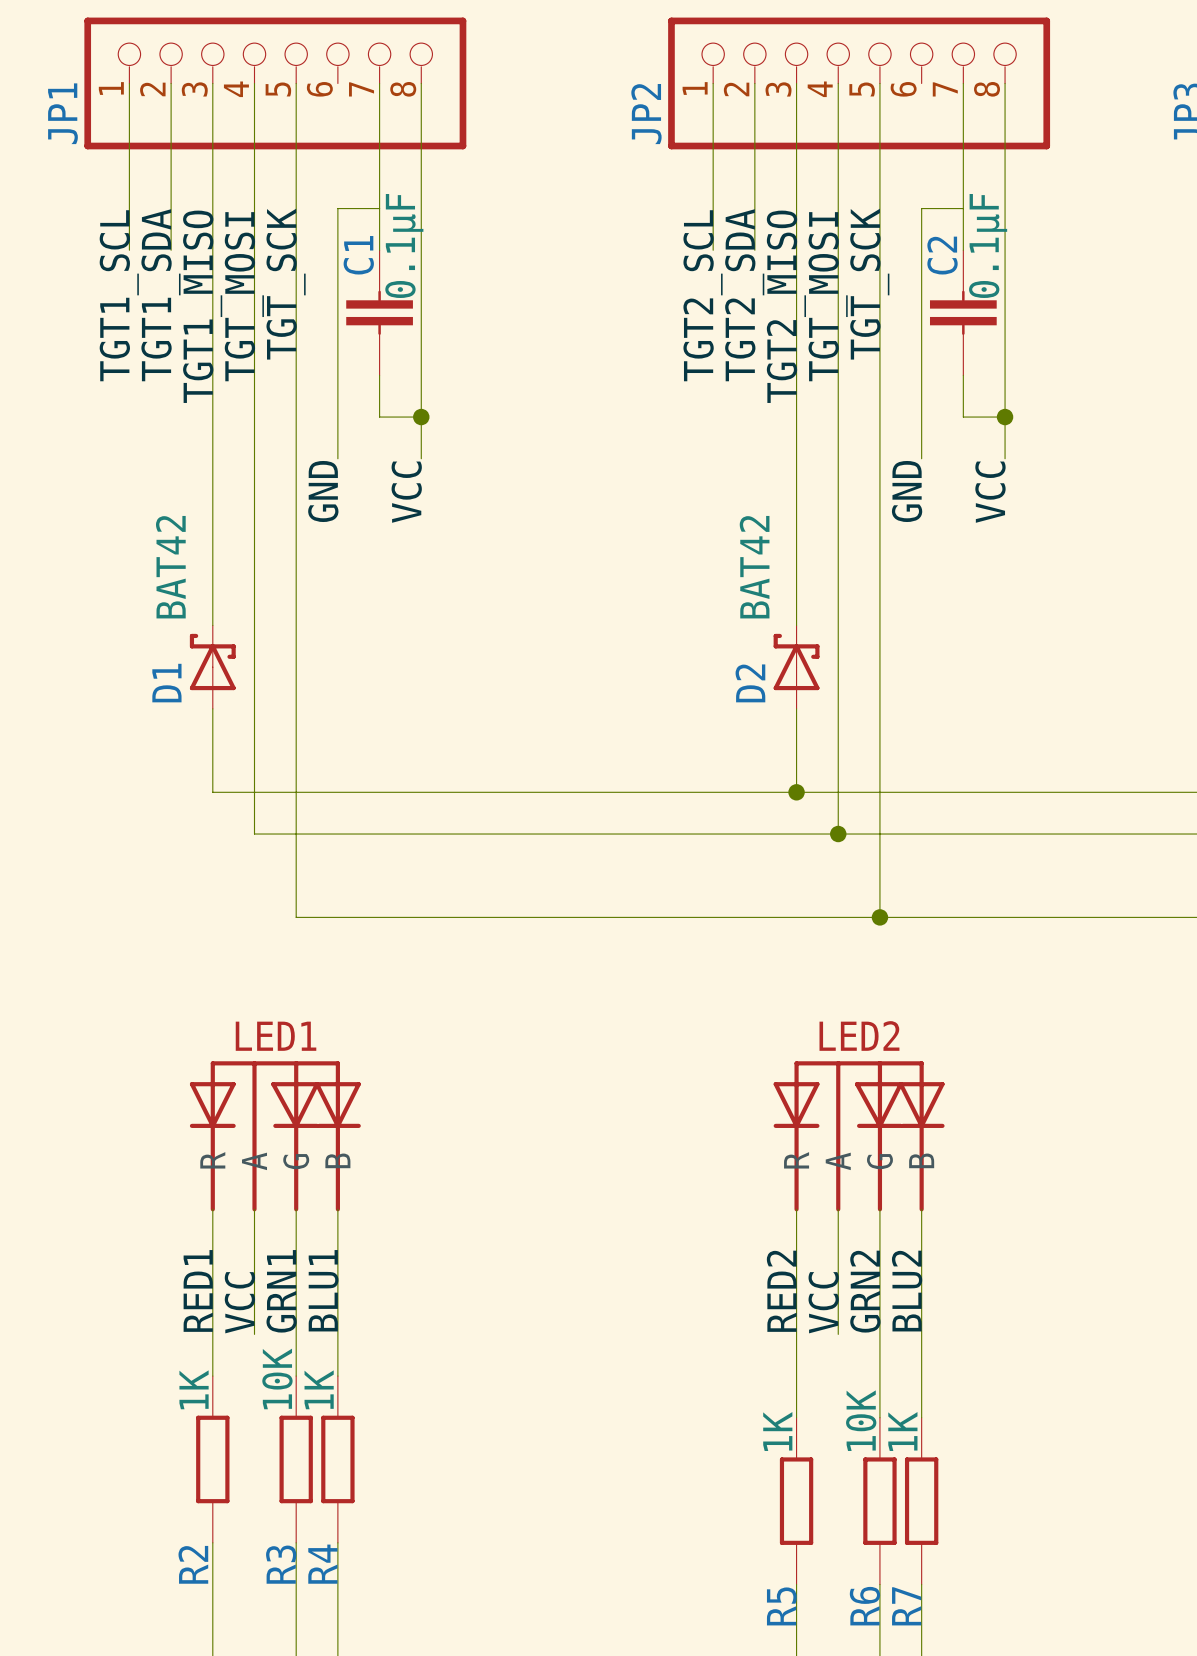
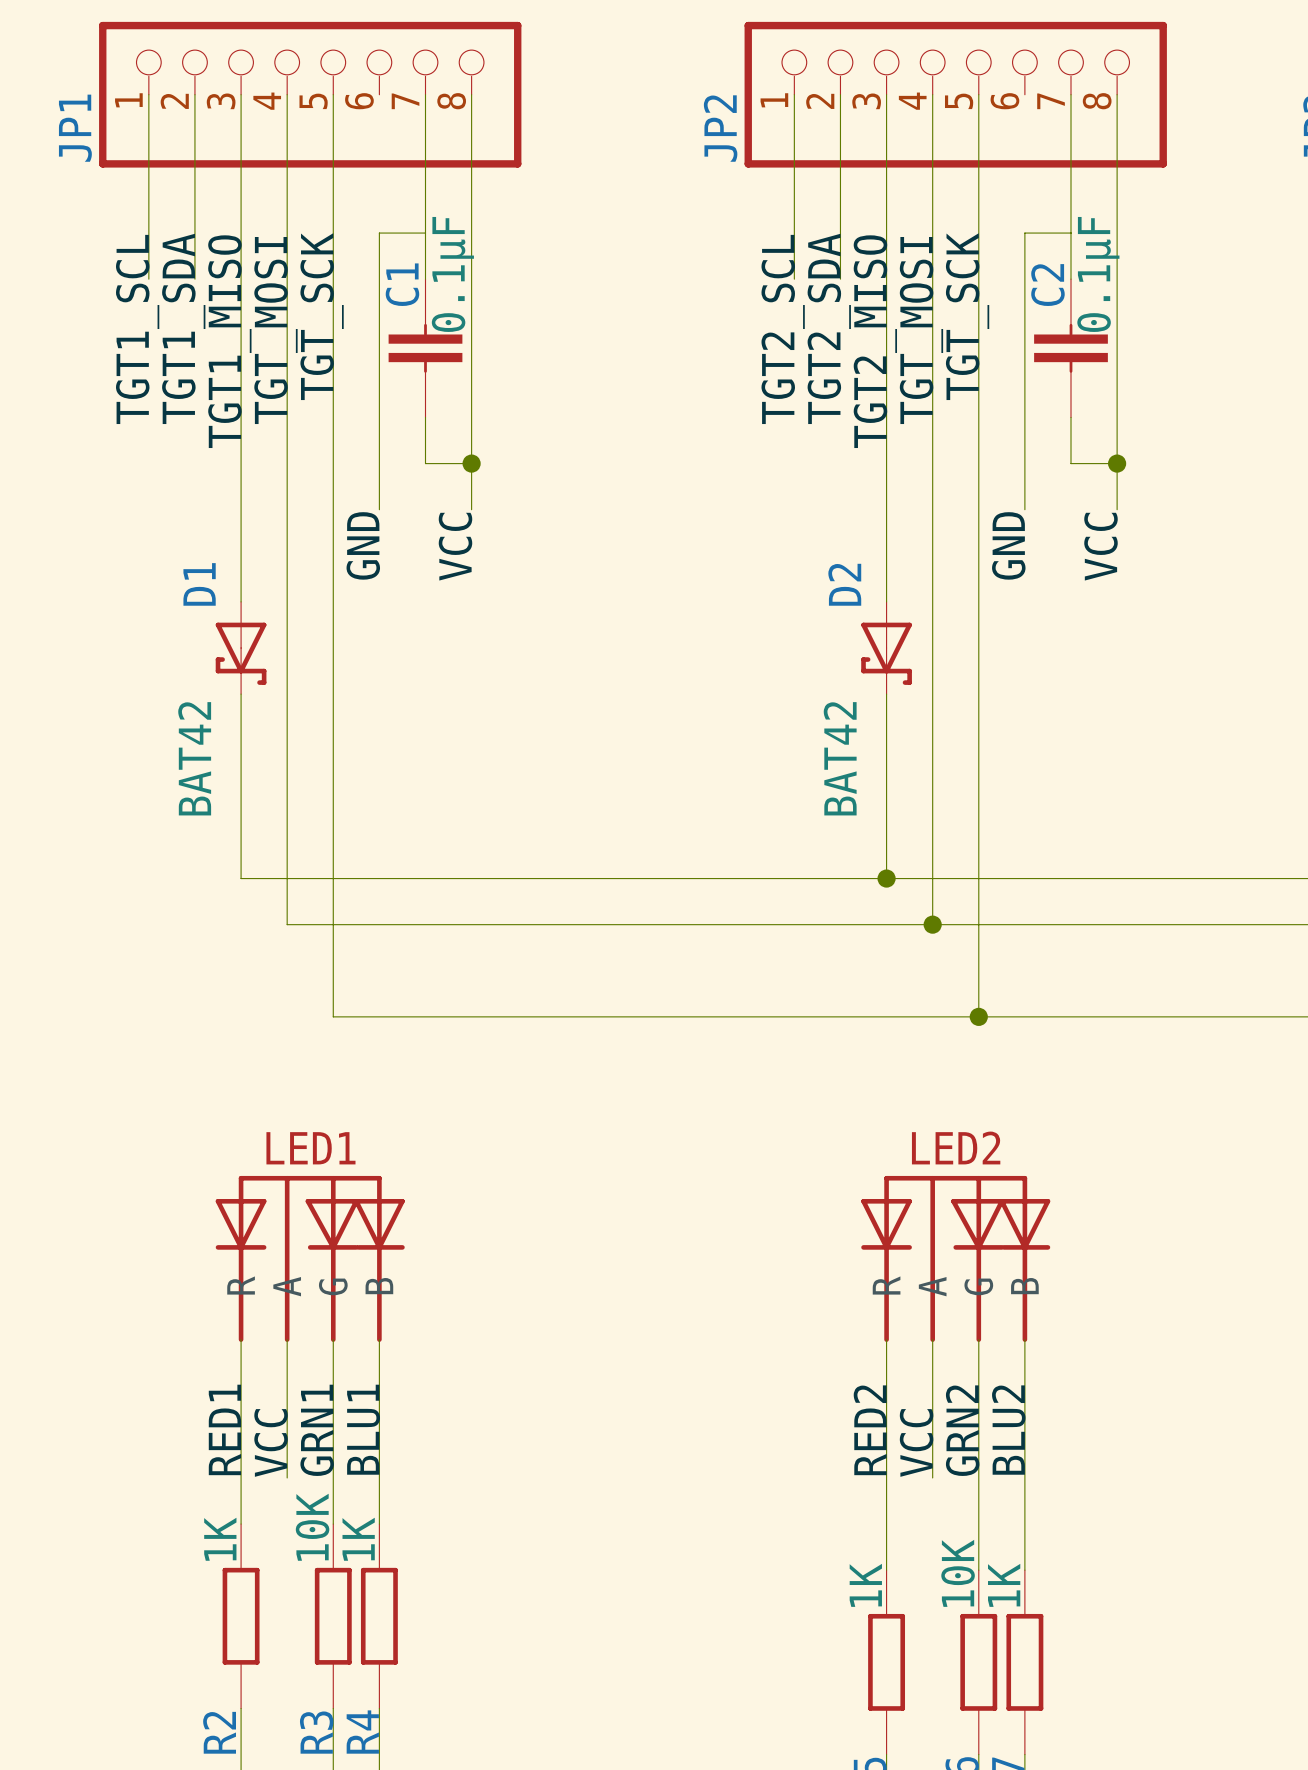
D1 value position: BAT42 (170, 567) -> BAT42 (194, 758)
D2 value position: BAT42 (754, 567) -> BAT42 (840, 758)
D1 rotation: 0° (212, 662) -> 180° (241, 653)
D2 rotation: 0° (796, 662) -> 180° (886, 653)
D1 position: (212, 667) -> (241, 648)
D2 position: (796, 667) -> (886, 648)
D1 name position: D1 (166, 683) -> D1 (199, 584)
D2 name position: D2 (750, 683) -> D2 (844, 584)

